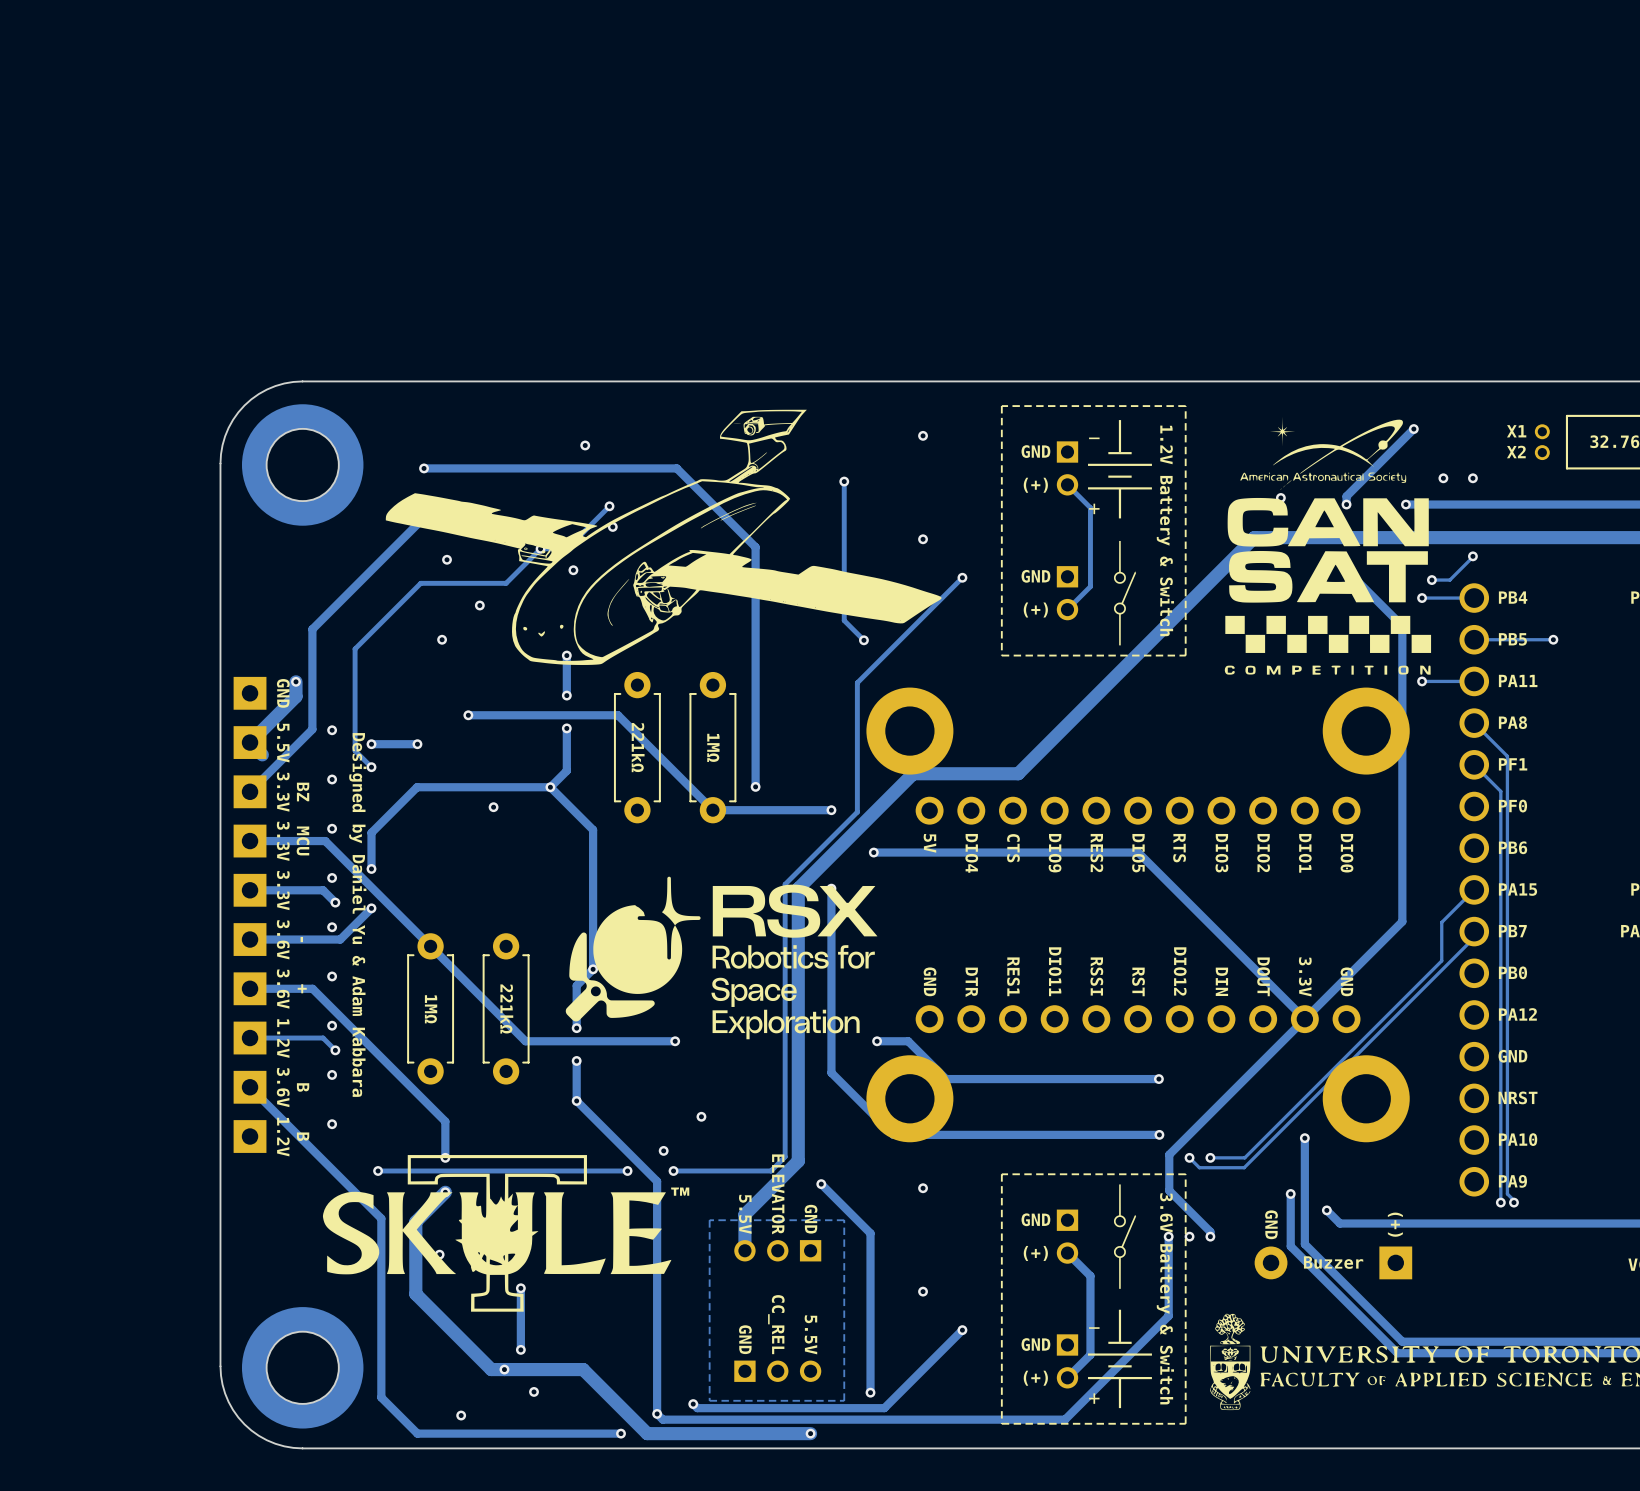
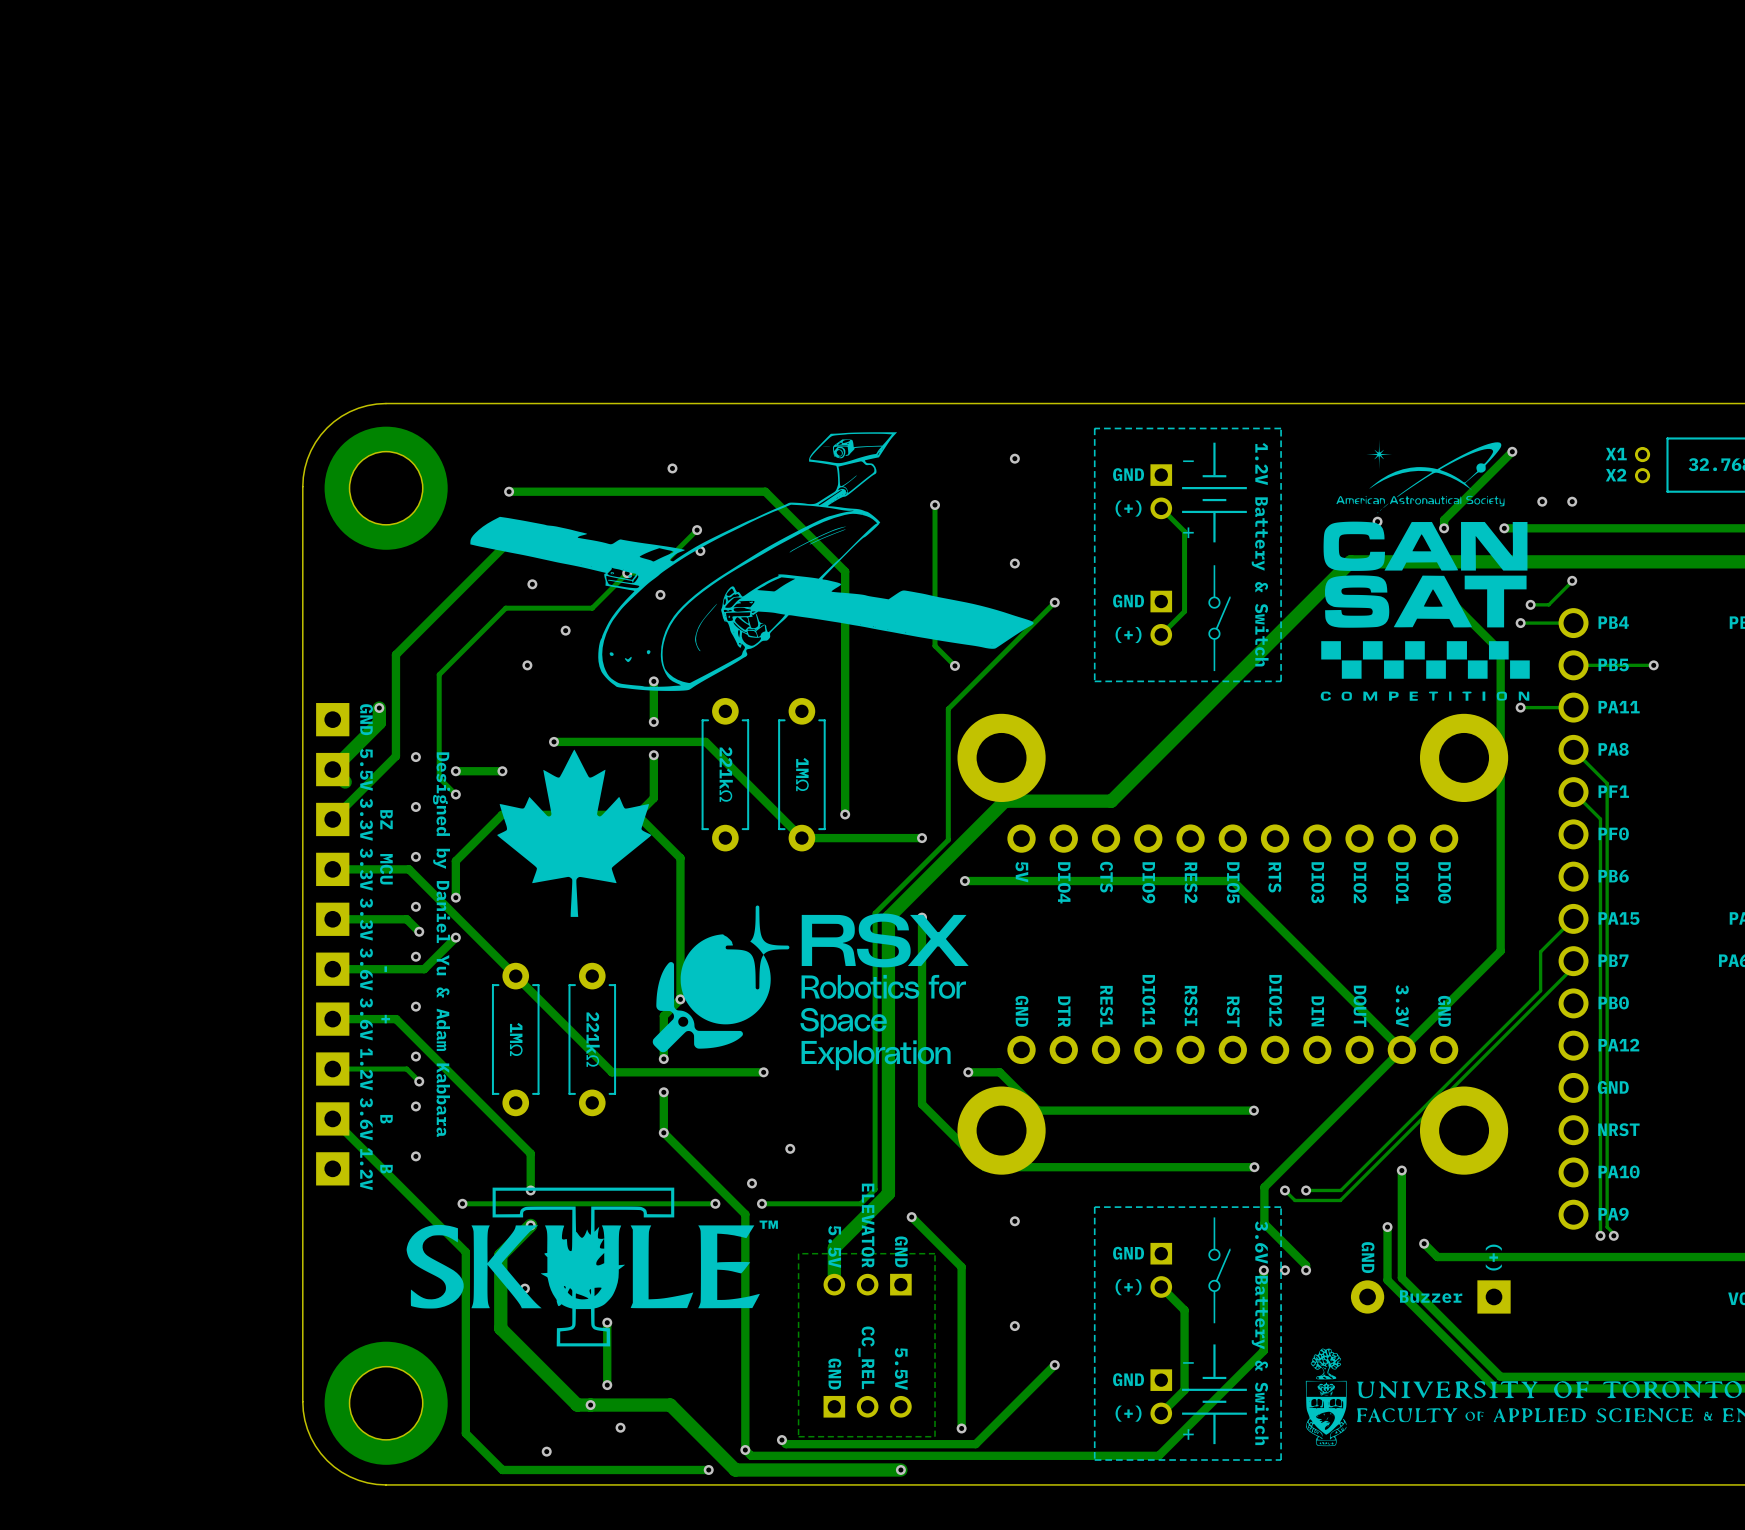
drawing: none -> [497, 749, 652, 917]

